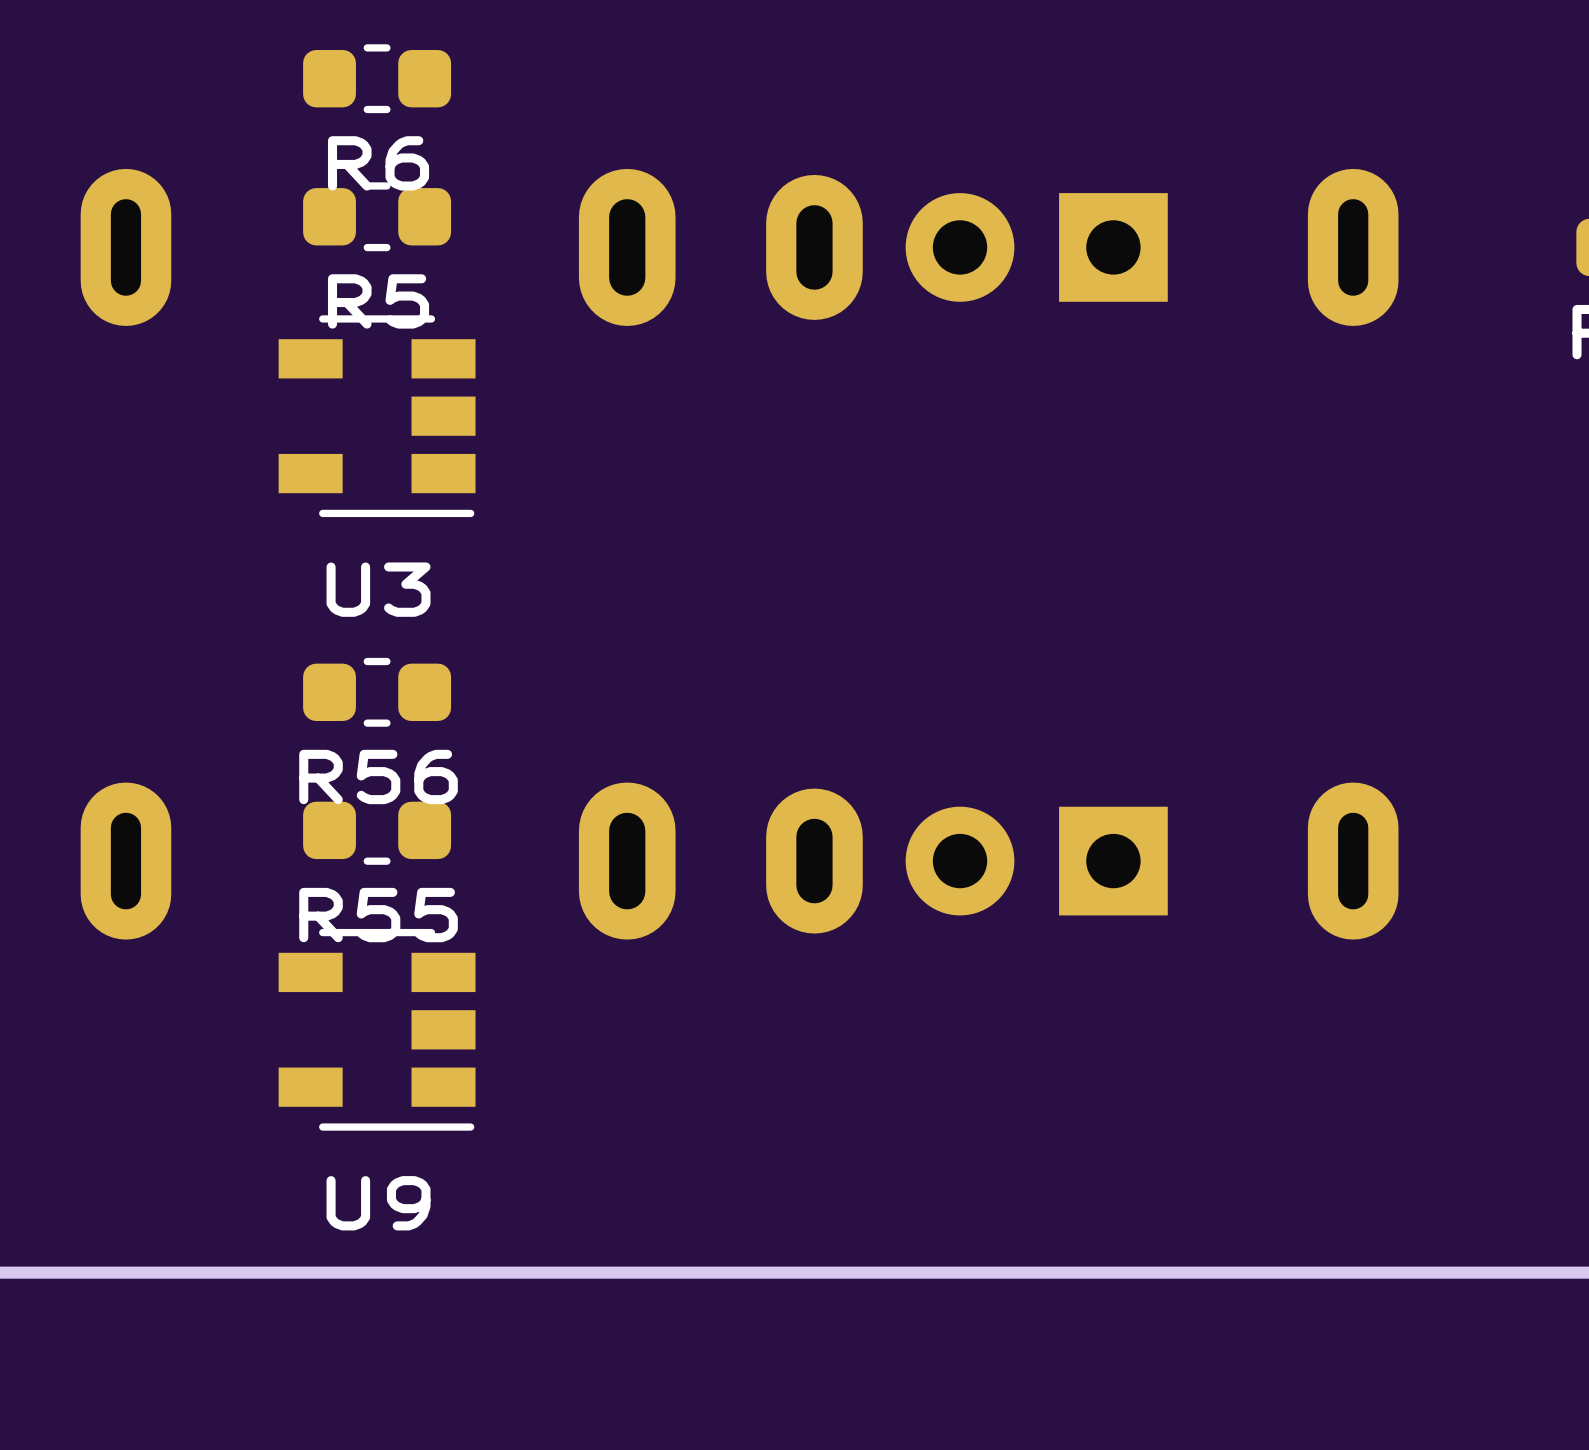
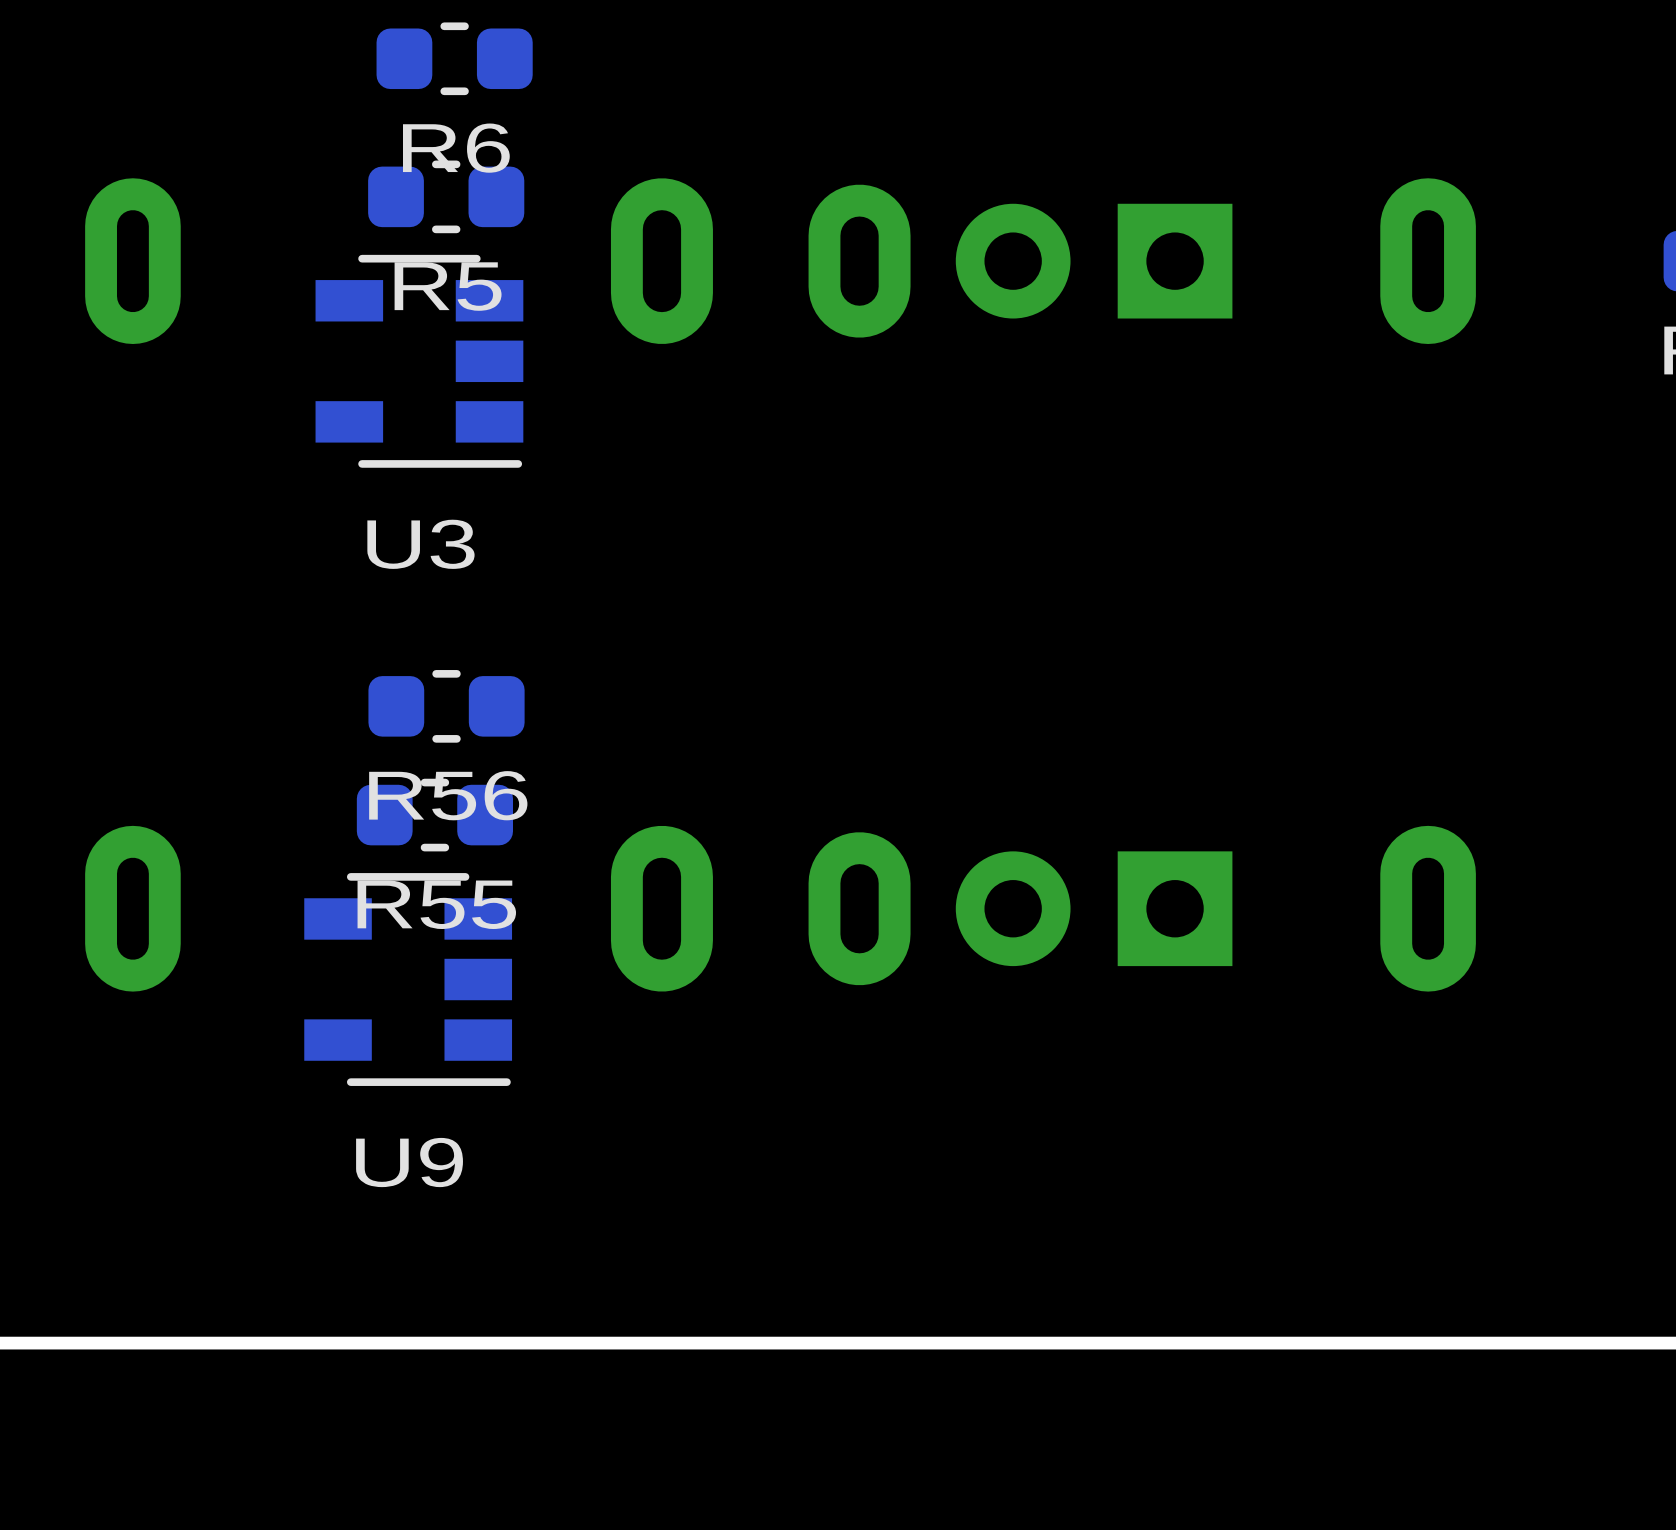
R6 position: (377, 78) -> (454, 58)
R5 position: (377, 216) -> (446, 196)
U3 position: (377, 416) -> (419, 361)
R56 position: (377, 692) -> (446, 706)
R55 position: (377, 830) -> (434, 815)
U9 position: (377, 1029) -> (408, 979)

